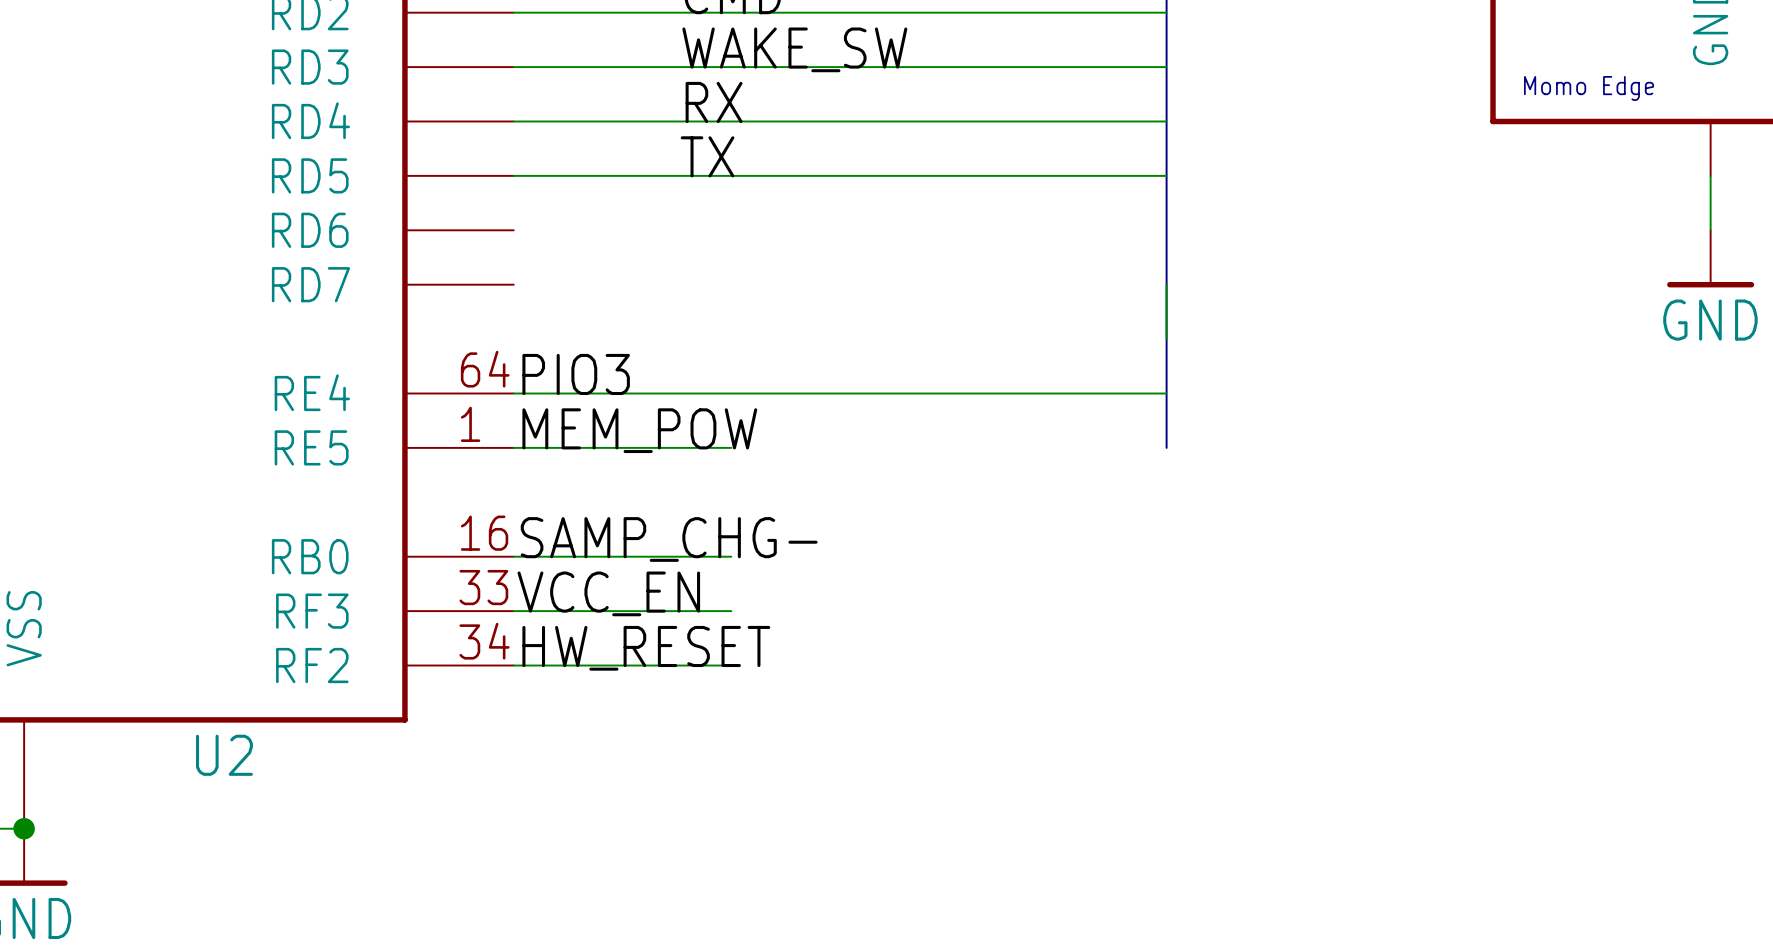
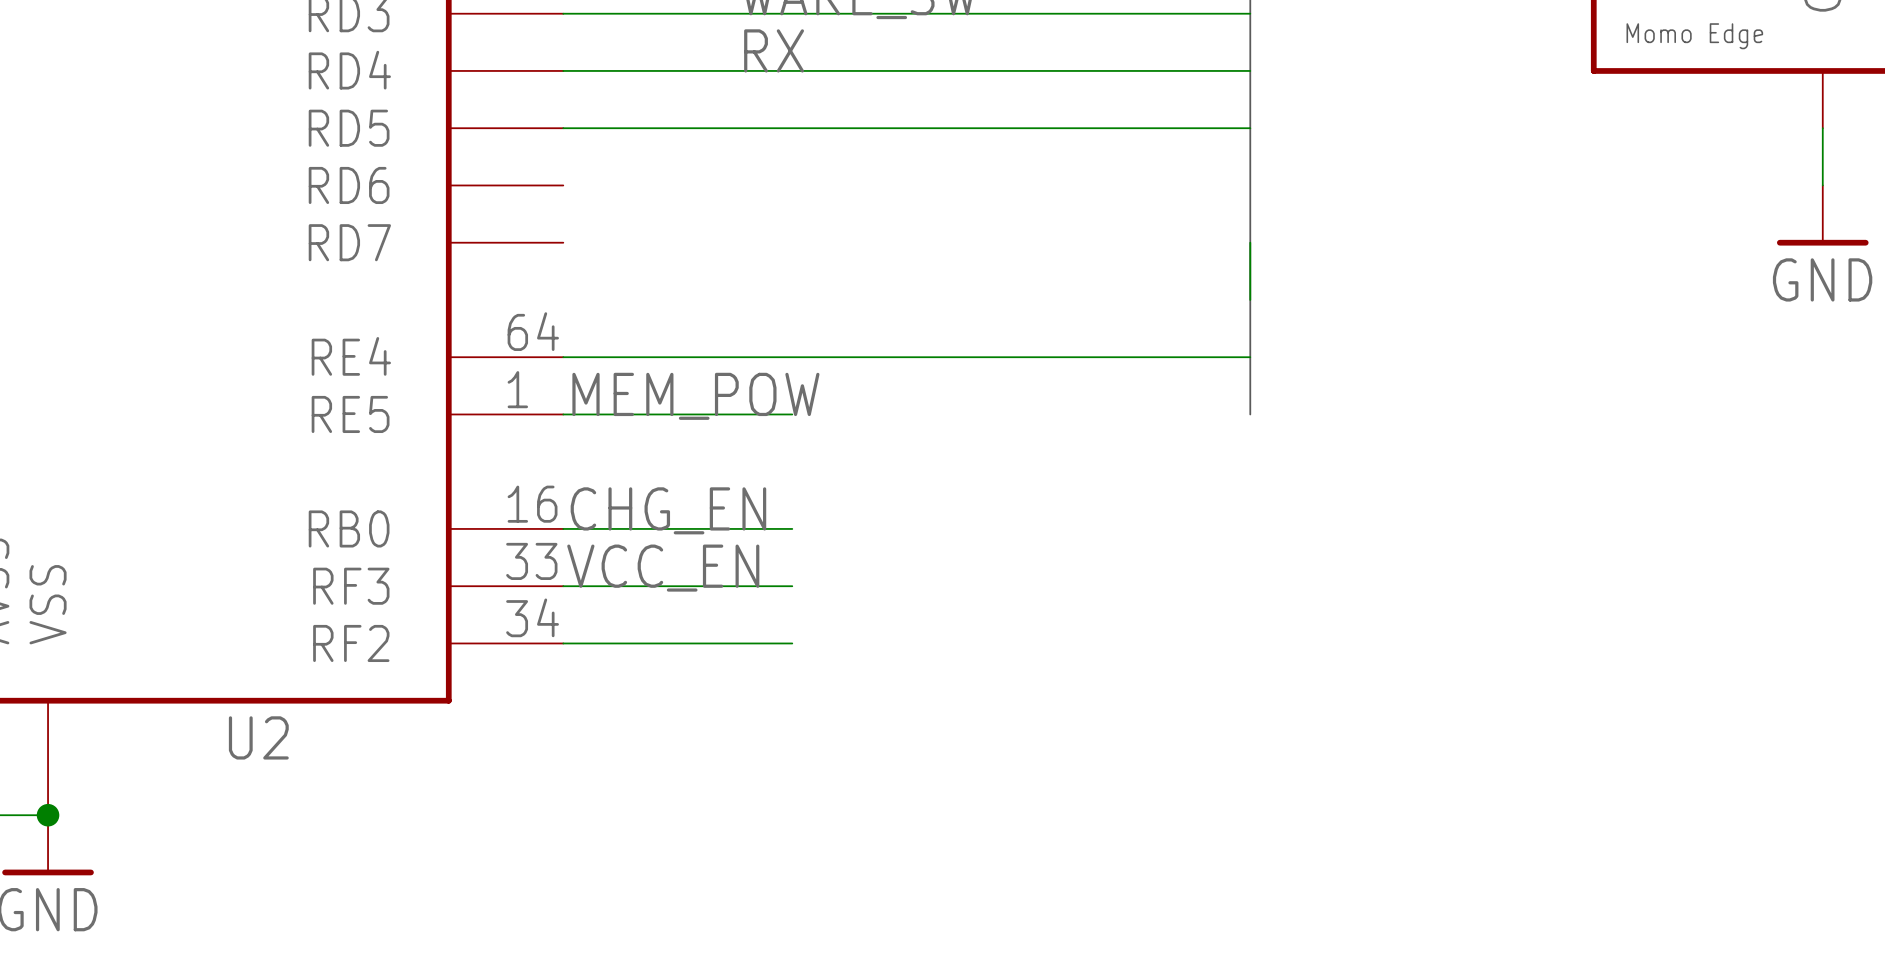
label: TX (707, 156) -> none
label: PIO3 (576, 374) -> none
label: SAMP_CHG- (669, 539) -> CHG_EN (668, 510)
label: HW_RESET (646, 648) -> none

